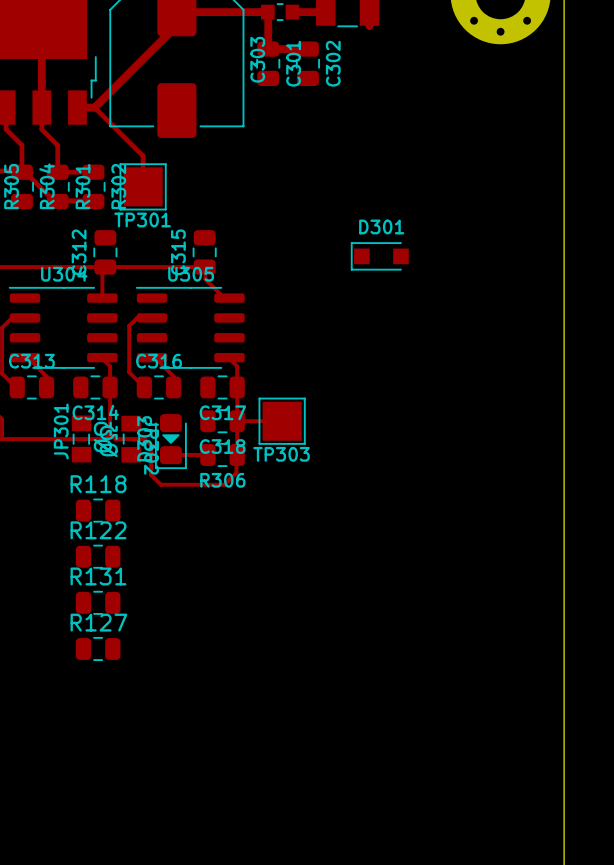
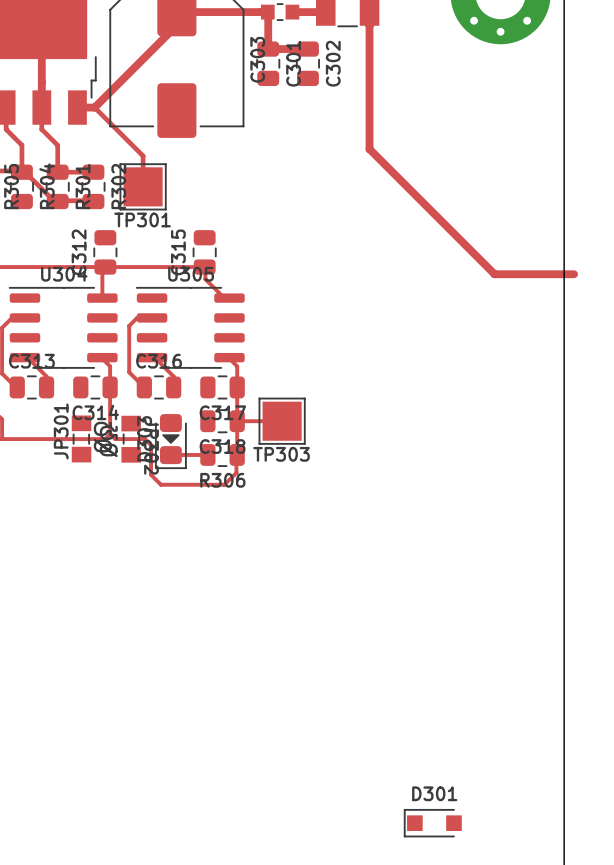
track: none -> (369, 25) (369, 149) (494, 274) (574, 274)
D301 position: (379, 256) -> (432, 823)
R118: (98, 510) -> none
R122: (98, 556) -> none
R131: (98, 602) -> none
R127: (98, 648) -> none

